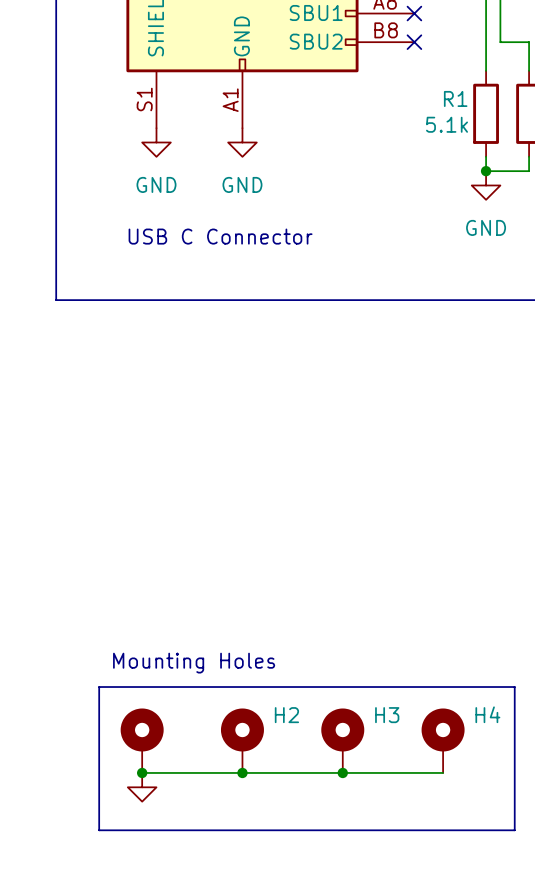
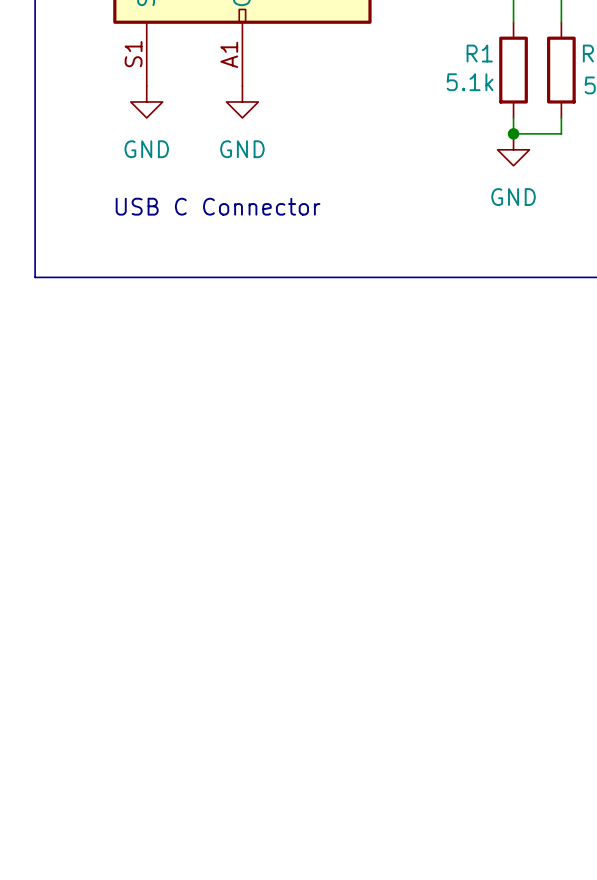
text: Mounting Holes (194, 663) -> none
line: (99, 687) (514, 687) (514, 830) (99, 830) (99, 687) -> none
part: (142, 740) -> none
H2: (242, 740) -> none
H3: (342, 740) -> none
H4: (443, 740) -> none
wire: (142, 772) (443, 772) -> none
junction: (142, 772) -> none
junction: (242, 772) -> none
junction: (342, 772) -> none
power symbol: (142, 787) -> none

